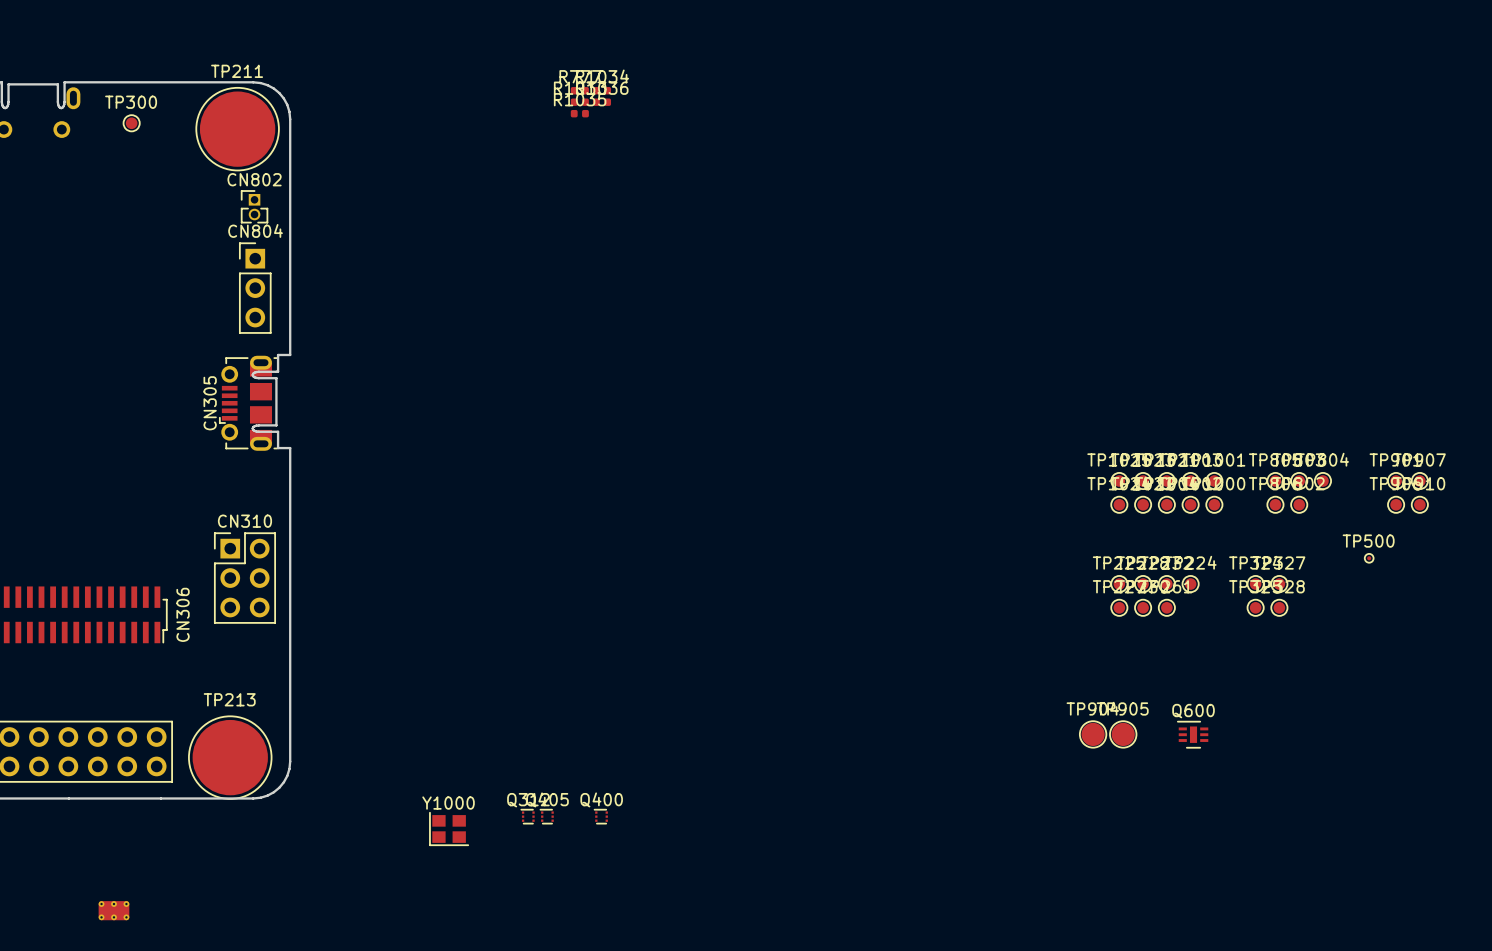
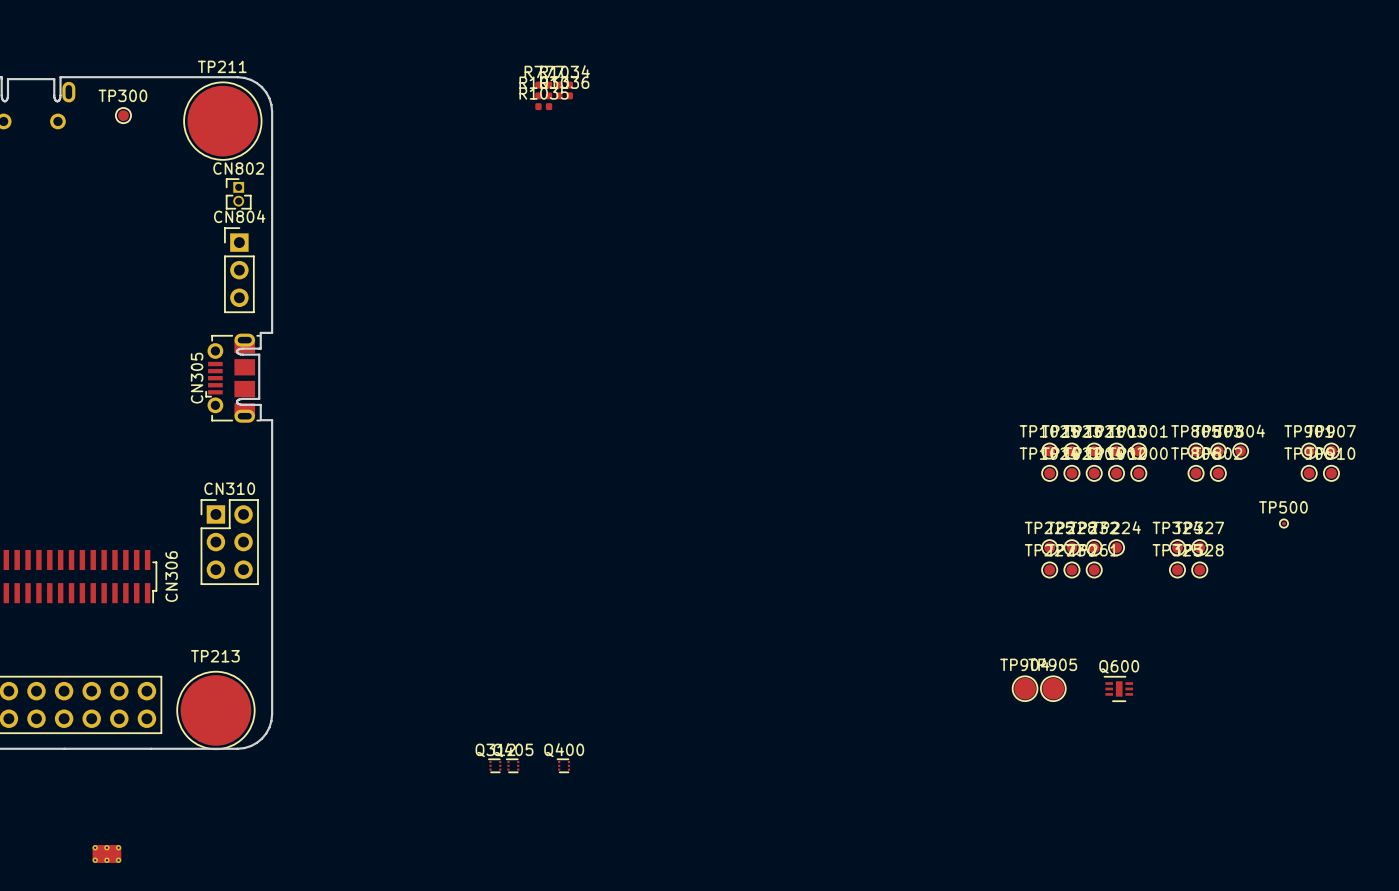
Y1000: (449, 828) -> none

